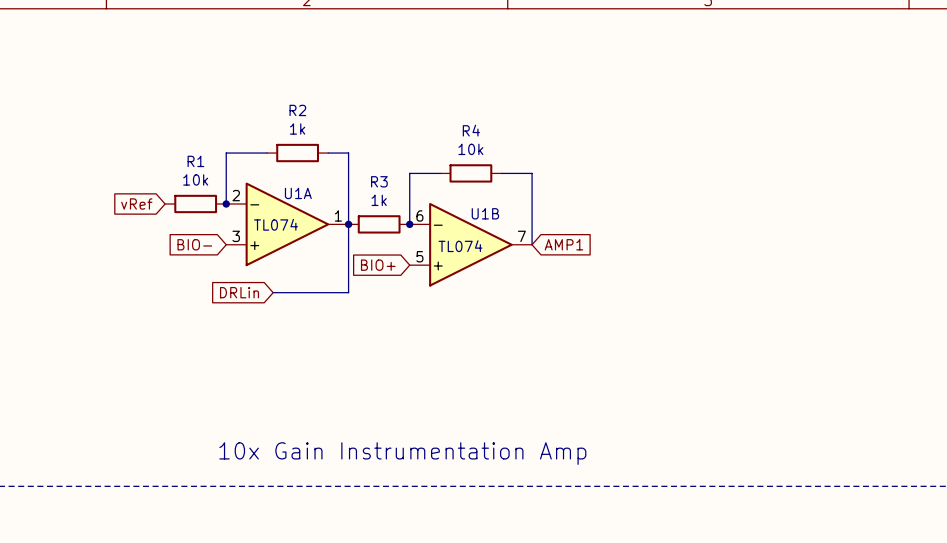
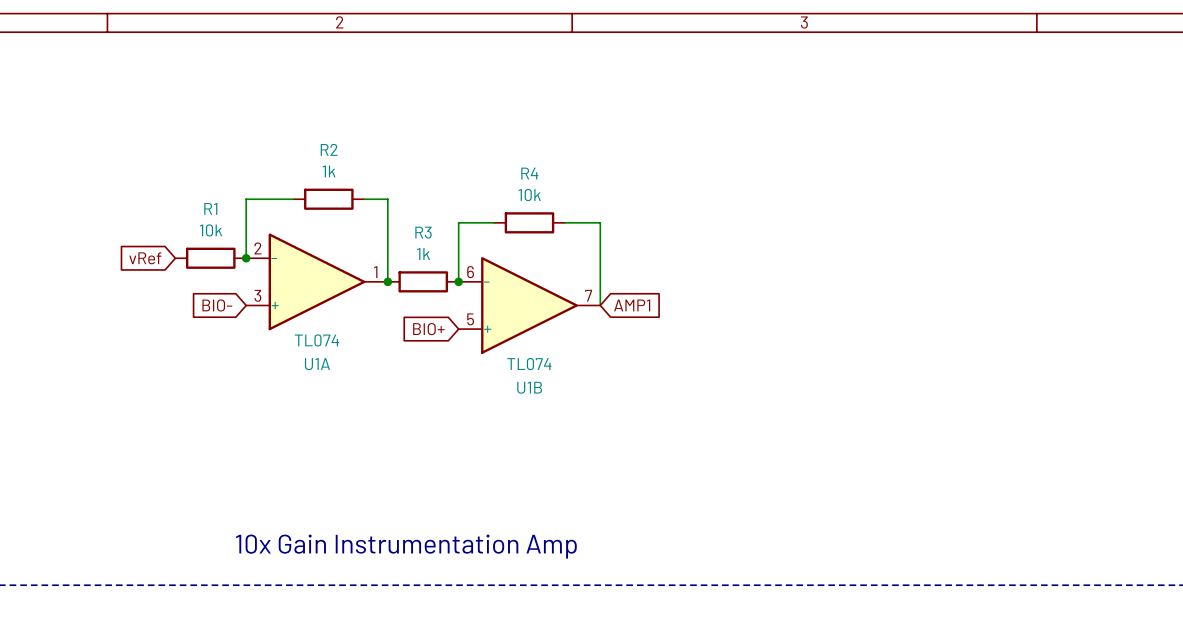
U1A name position: U1A (298, 193) -> U1A (317, 364)
U1B name position: U1B (485, 213) -> U1B (529, 387)
U1A value position: TL074 (275, 224) -> TL074 (316, 340)
wire: (348, 224) (348, 292) (273, 292) -> none
U1B value position: TL074 (460, 246) -> TL074 (529, 364)
global label: DRLin (239, 292) -> none

